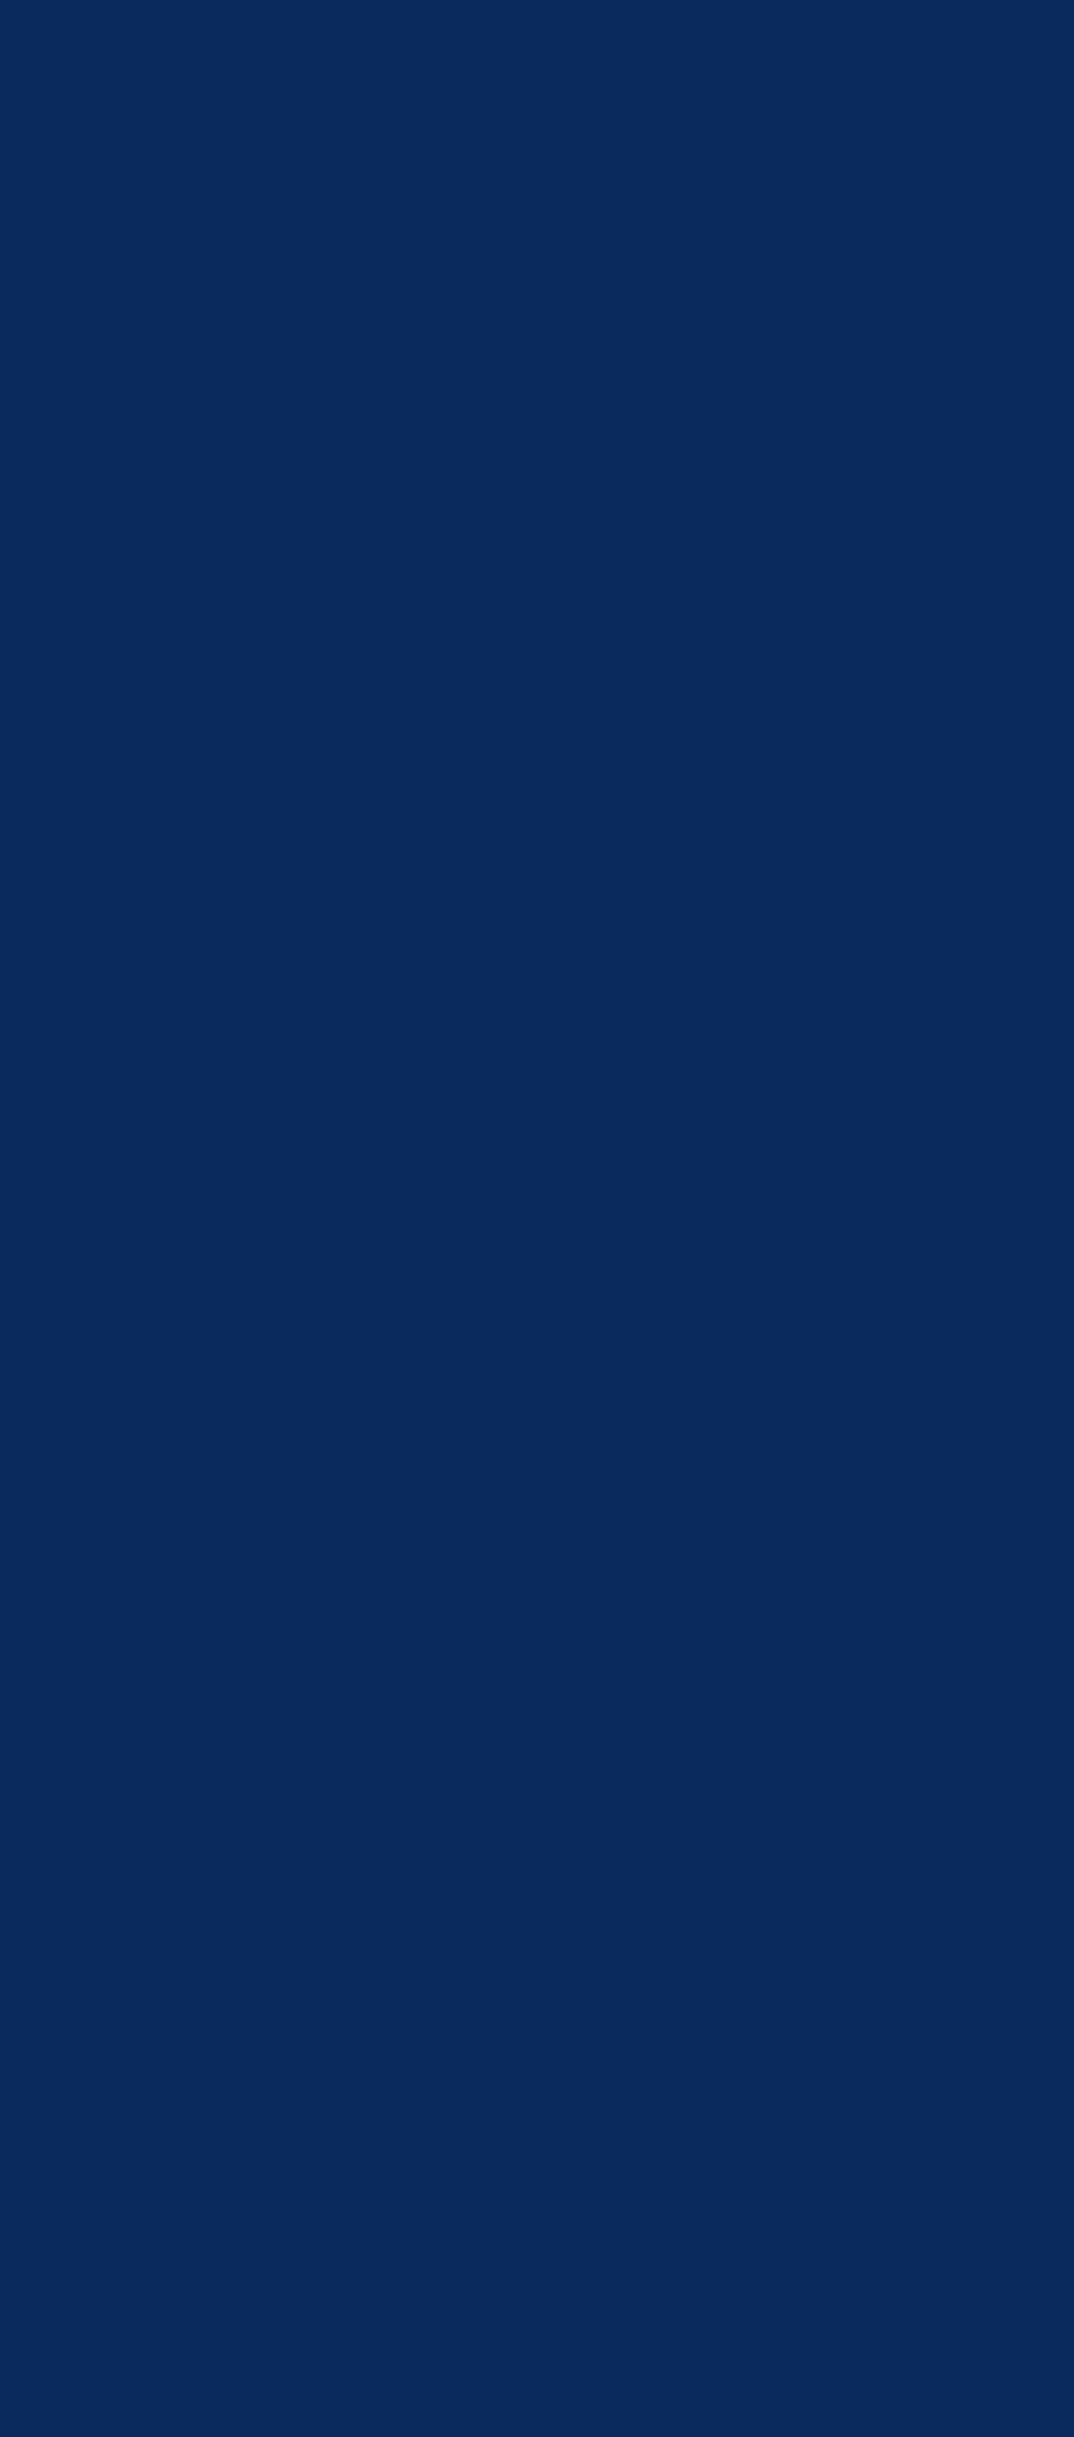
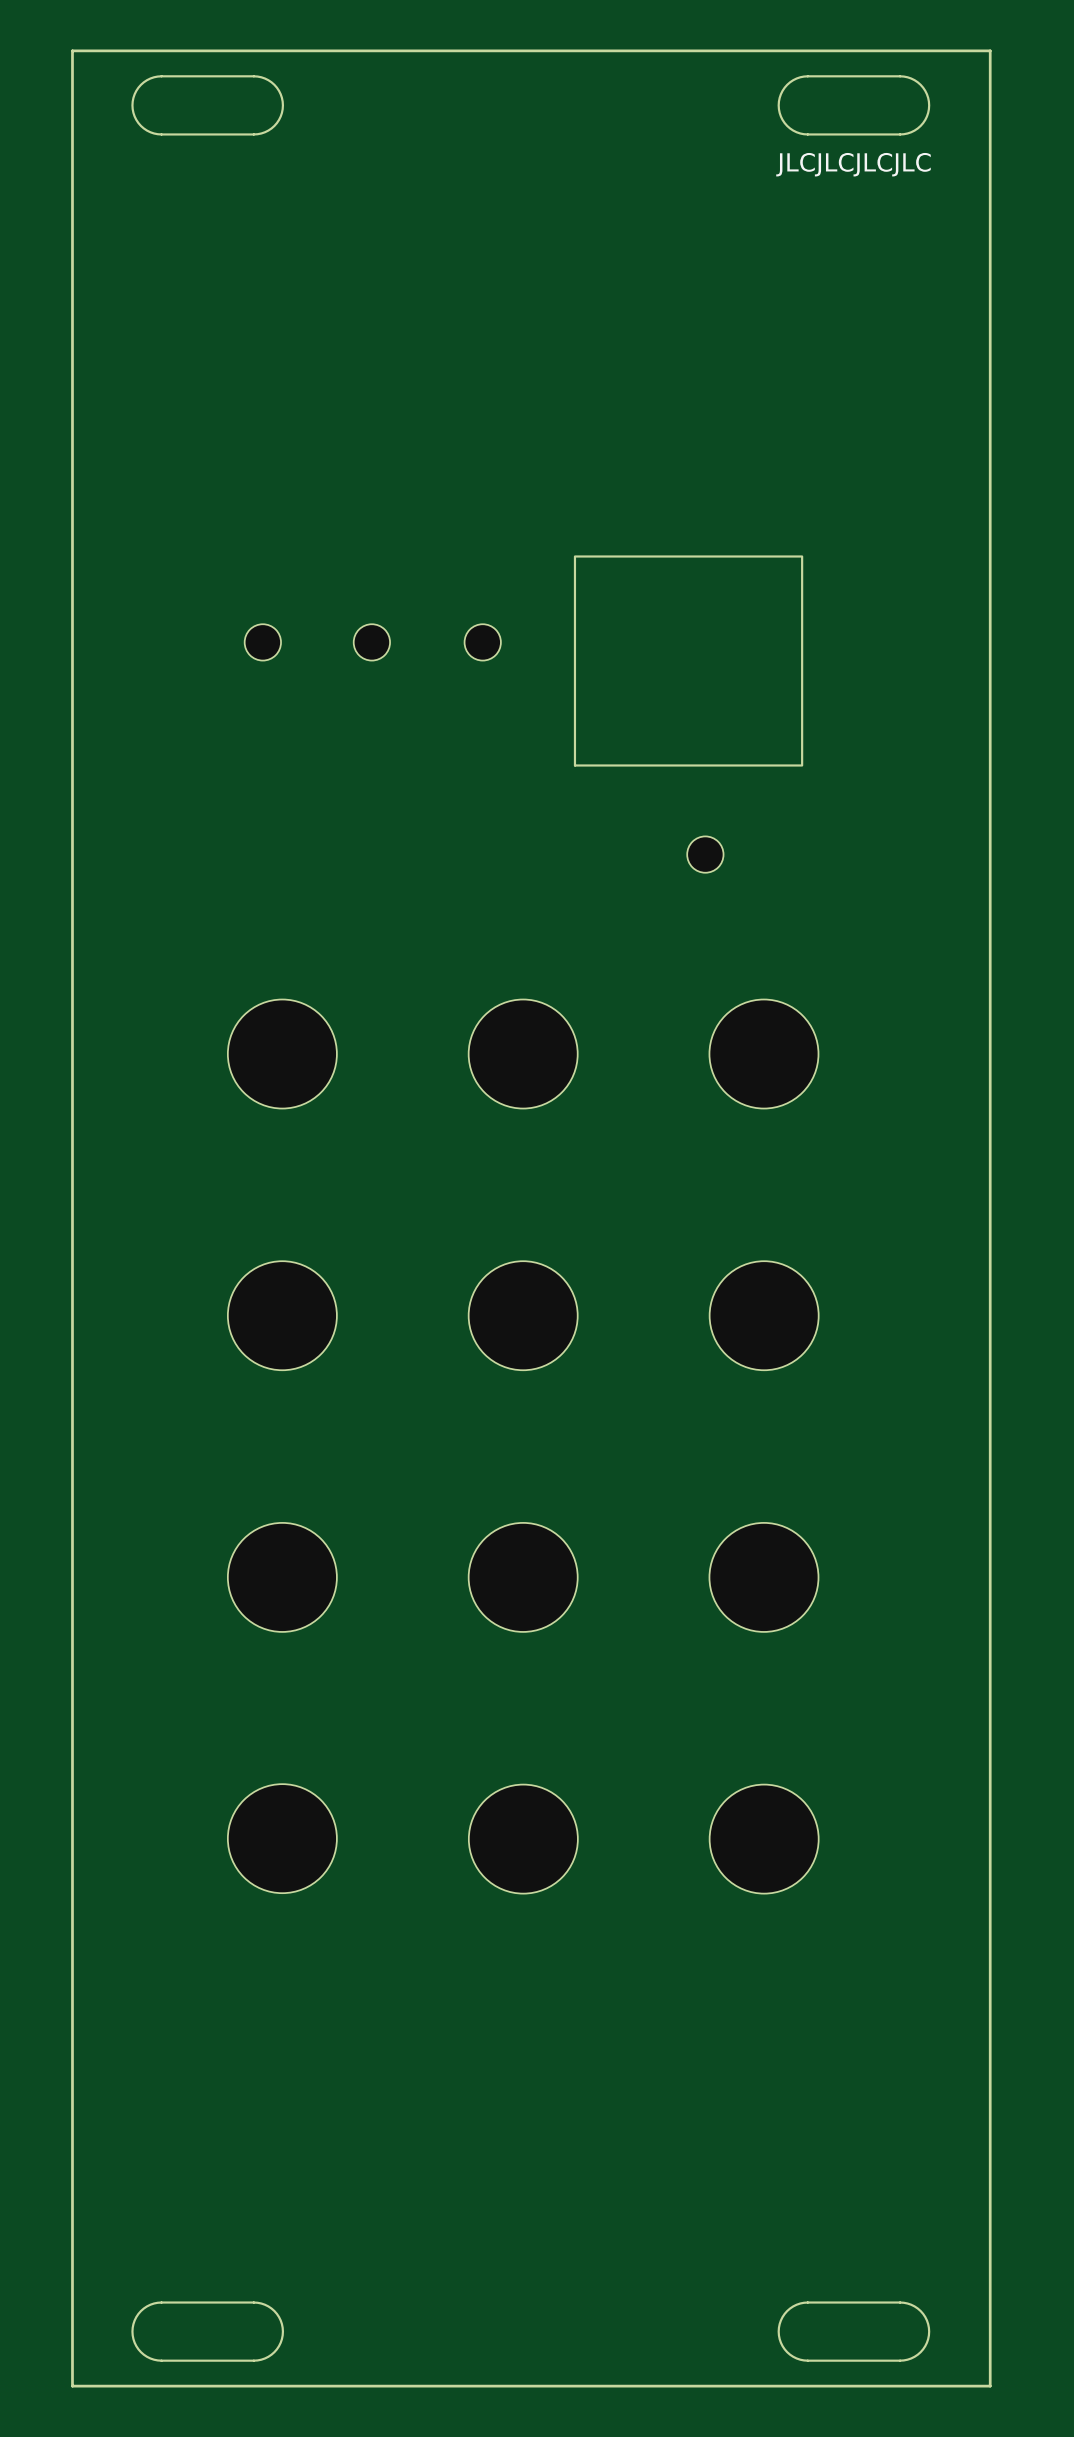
board edge: none -> (990, 50) (990, 2386) (72, 2386) (72, 50) (990, 50)
drawing: none -> [131, 75, 285, 136]
drawing: none -> [777, 75, 931, 136]
text: none -> JLCJLCJLCJLC (853, 164)
drawing: none -> [573, 555, 804, 767]
part: none -> (262, 642)
part: none -> (371, 642)
part: none -> (482, 642)
part: none -> (705, 854)
part: none -> (282, 1054)
part: none -> (523, 1054)
part: none -> (763, 1054)
part: none -> (282, 1315)
part: none -> (523, 1315)
part: none -> (764, 1315)
part: none -> (282, 1577)
part: none -> (523, 1577)
part: none -> (763, 1577)
part: none -> (282, 1838)
part: none -> (523, 1839)
part: none -> (764, 1839)
drawing: none -> [131, 2301, 285, 2362]
drawing: none -> [777, 2301, 931, 2362]

